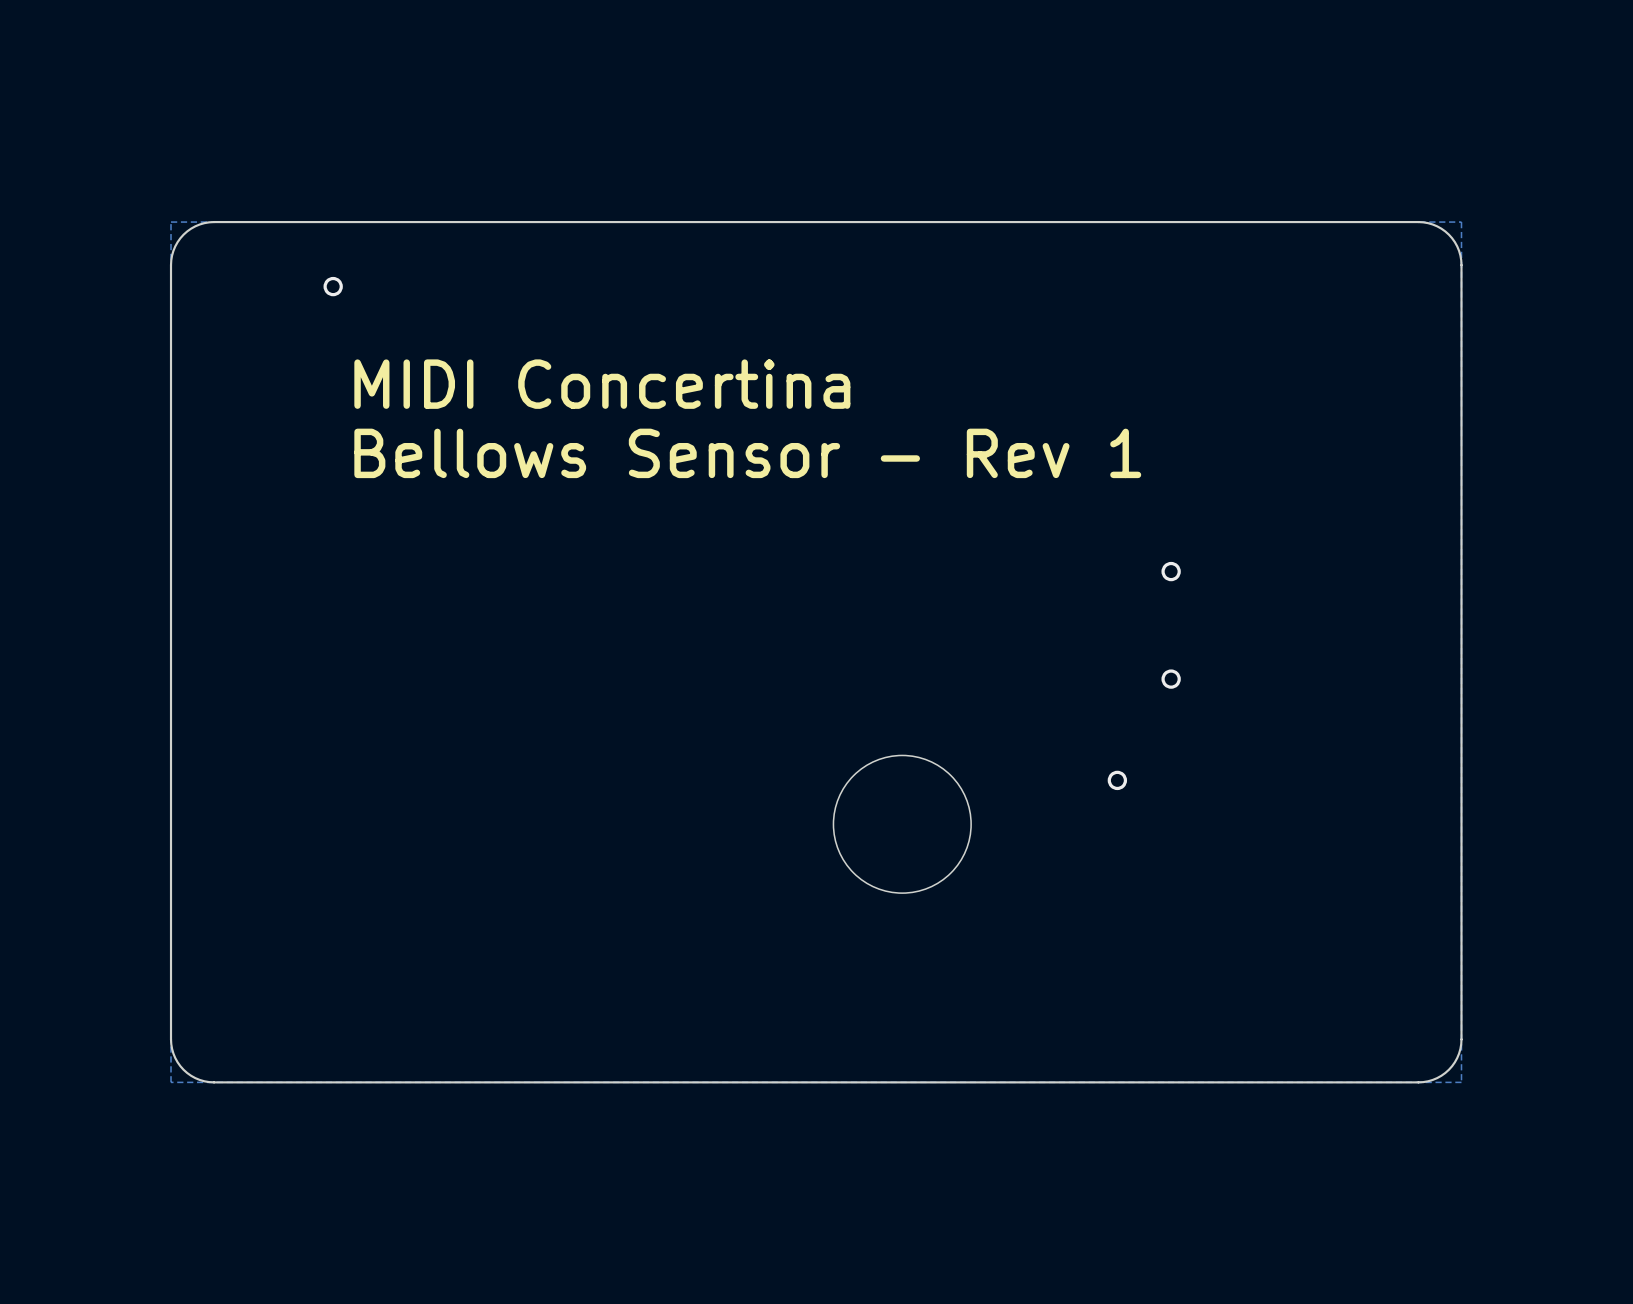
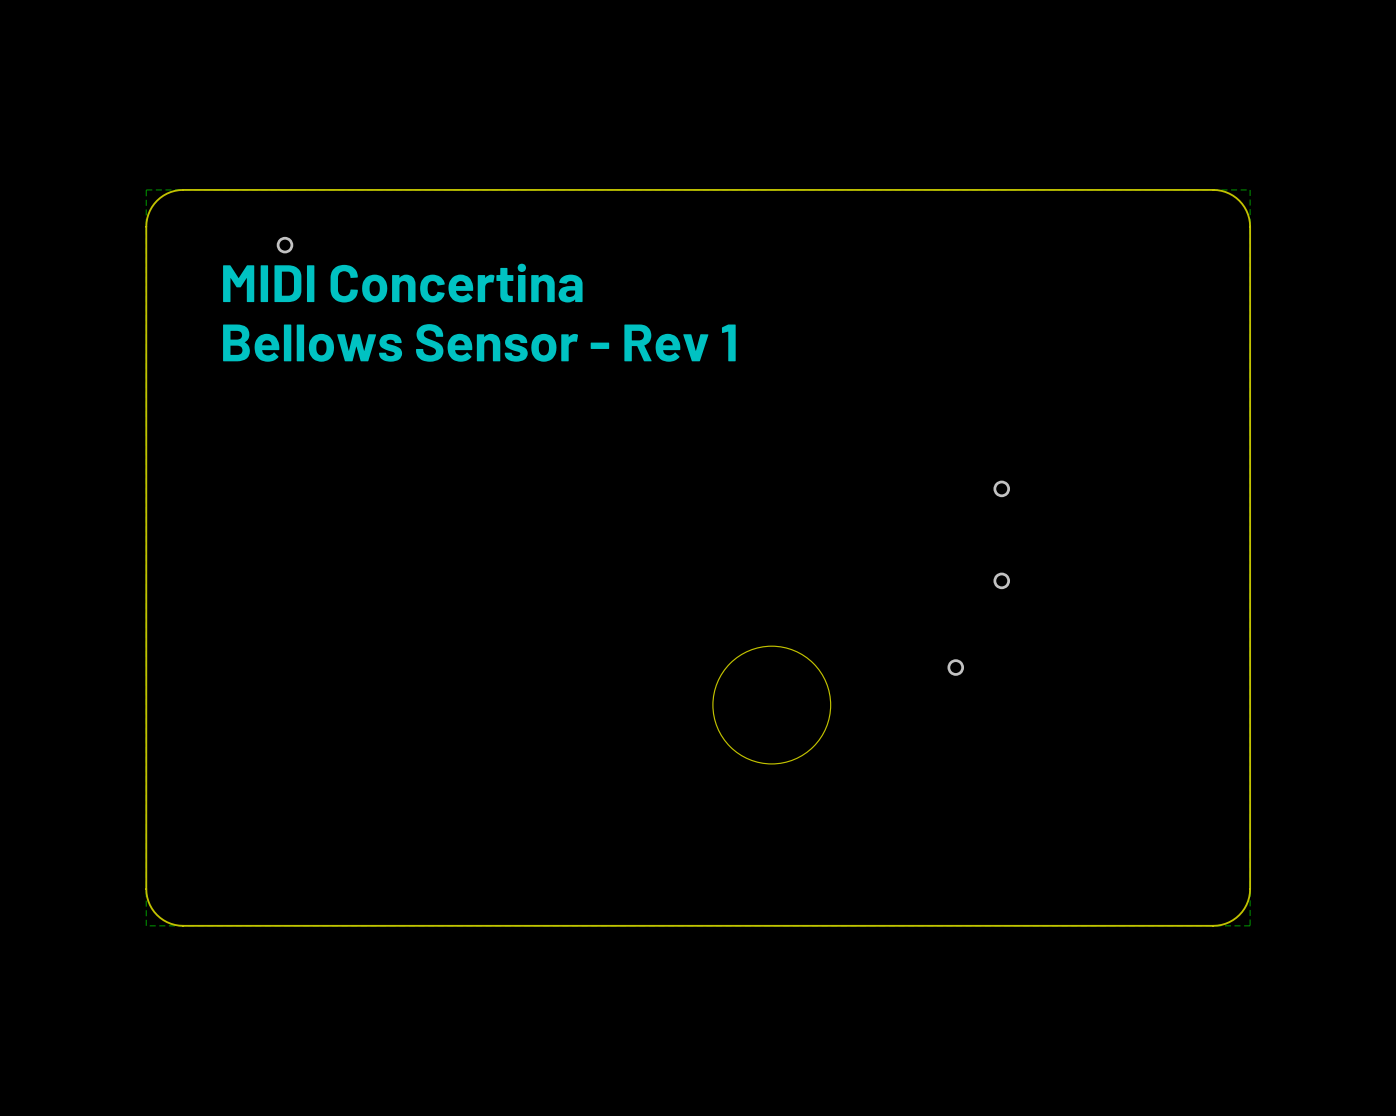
text position: MIDI Concertina (602, 384) -> MIDI Concertina (402, 283)
text position: Bellows Sensor - Rev 1 (747, 453) -> Bellows Sensor - Rev 1 (479, 342)

